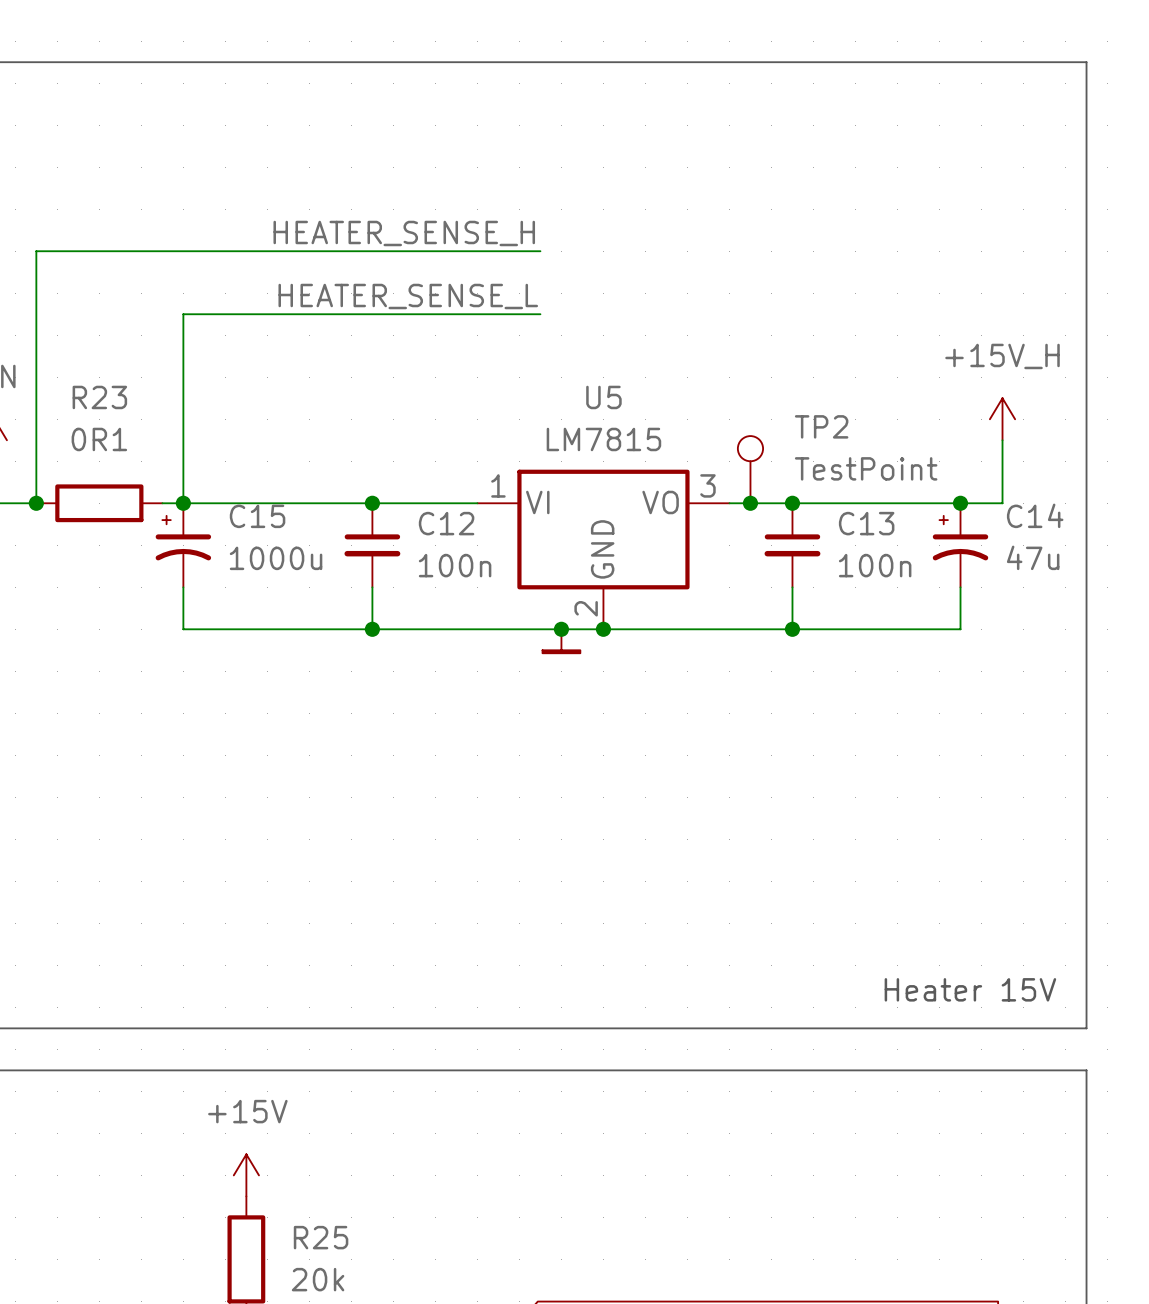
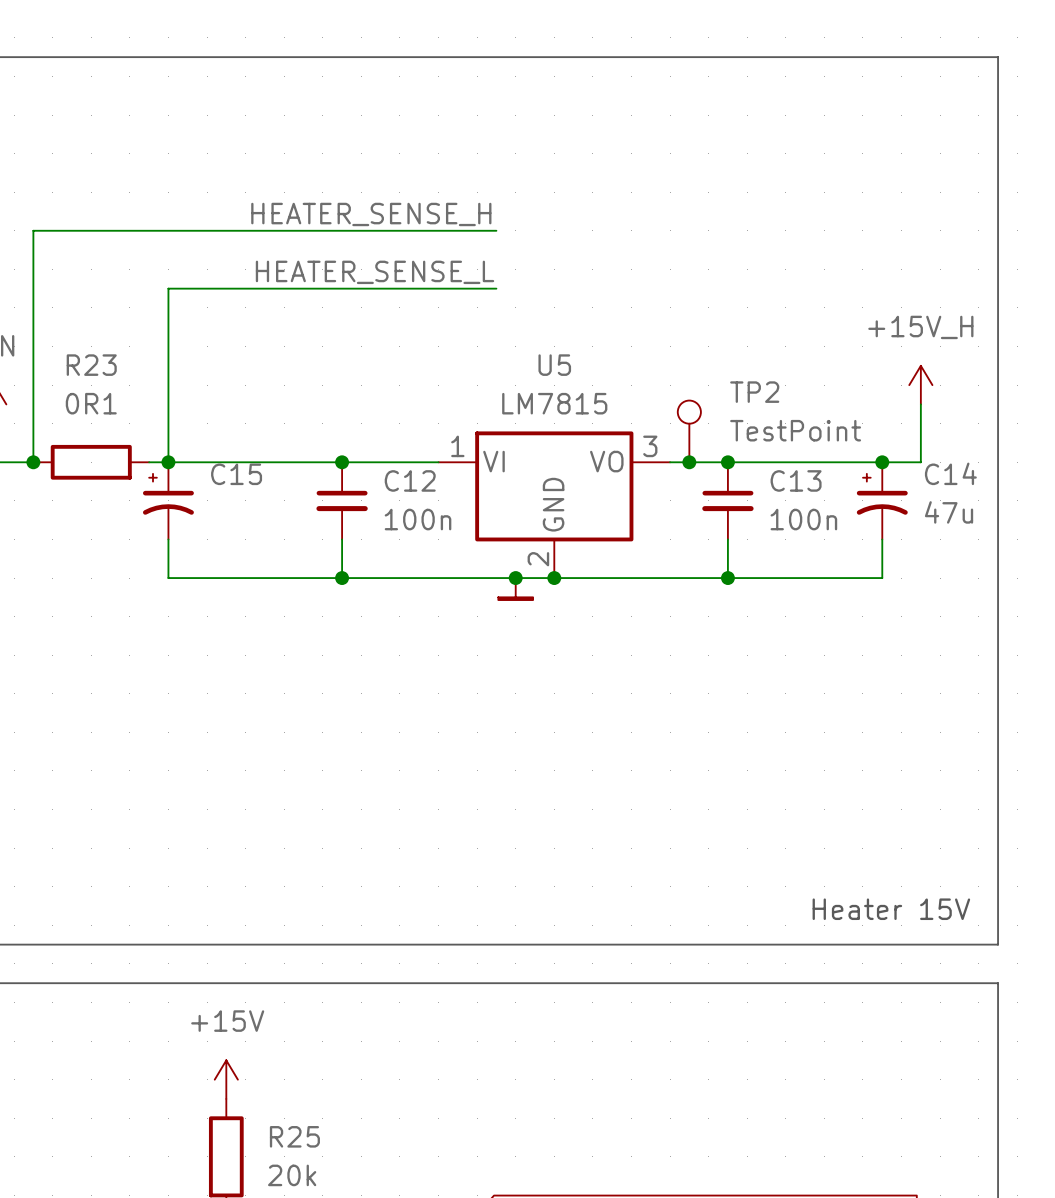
C15 value: 1000u (276, 558) -> none

